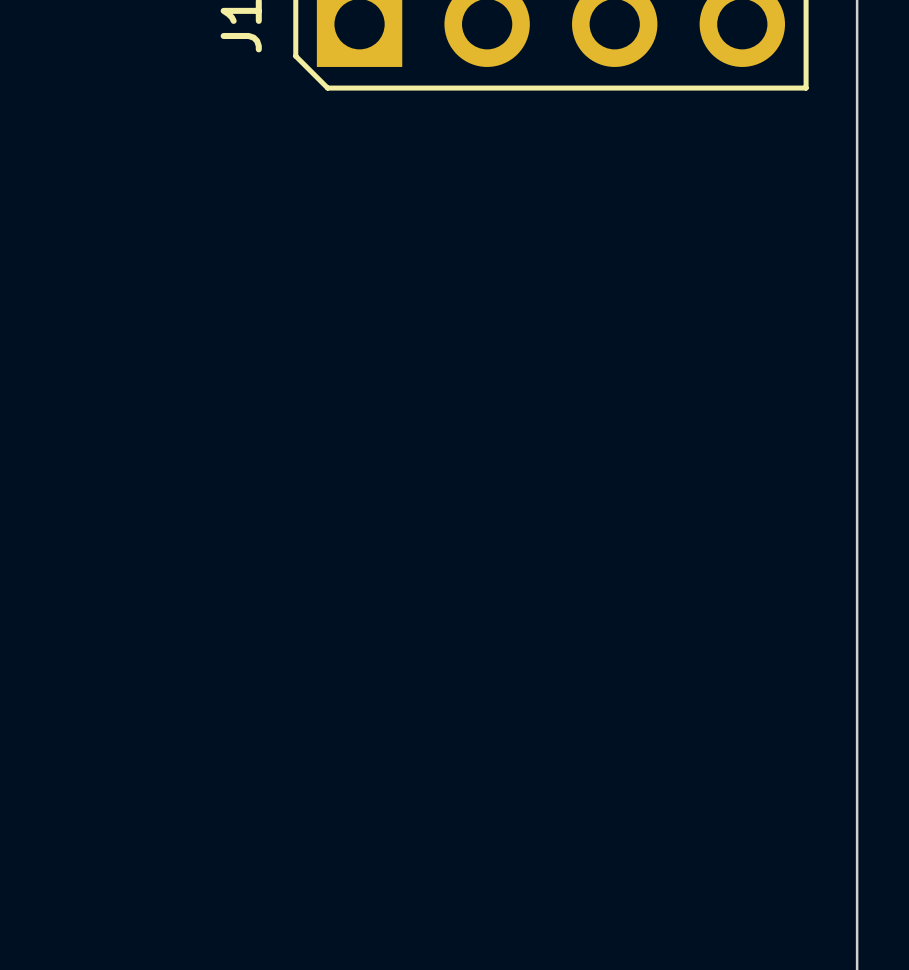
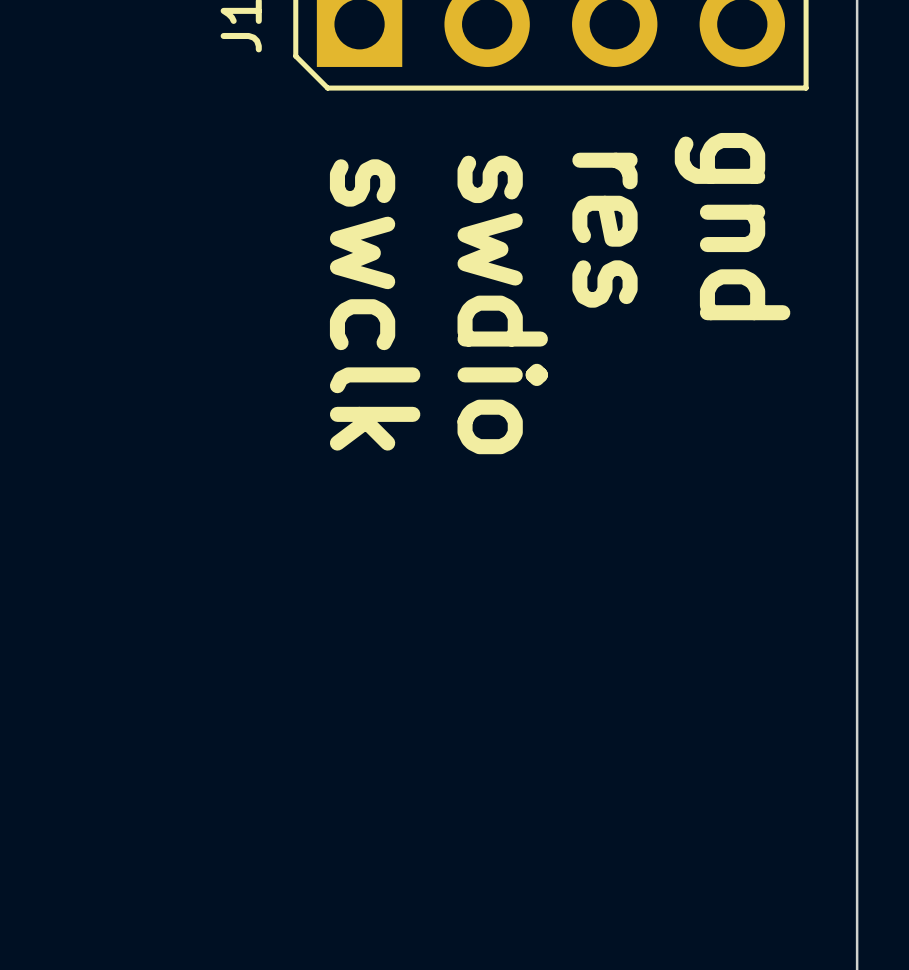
text: none -> gnd (732, 226)
text: none -> res (604, 230)
text: none -> swclk (375, 304)
text: none -> swdio (502, 304)

